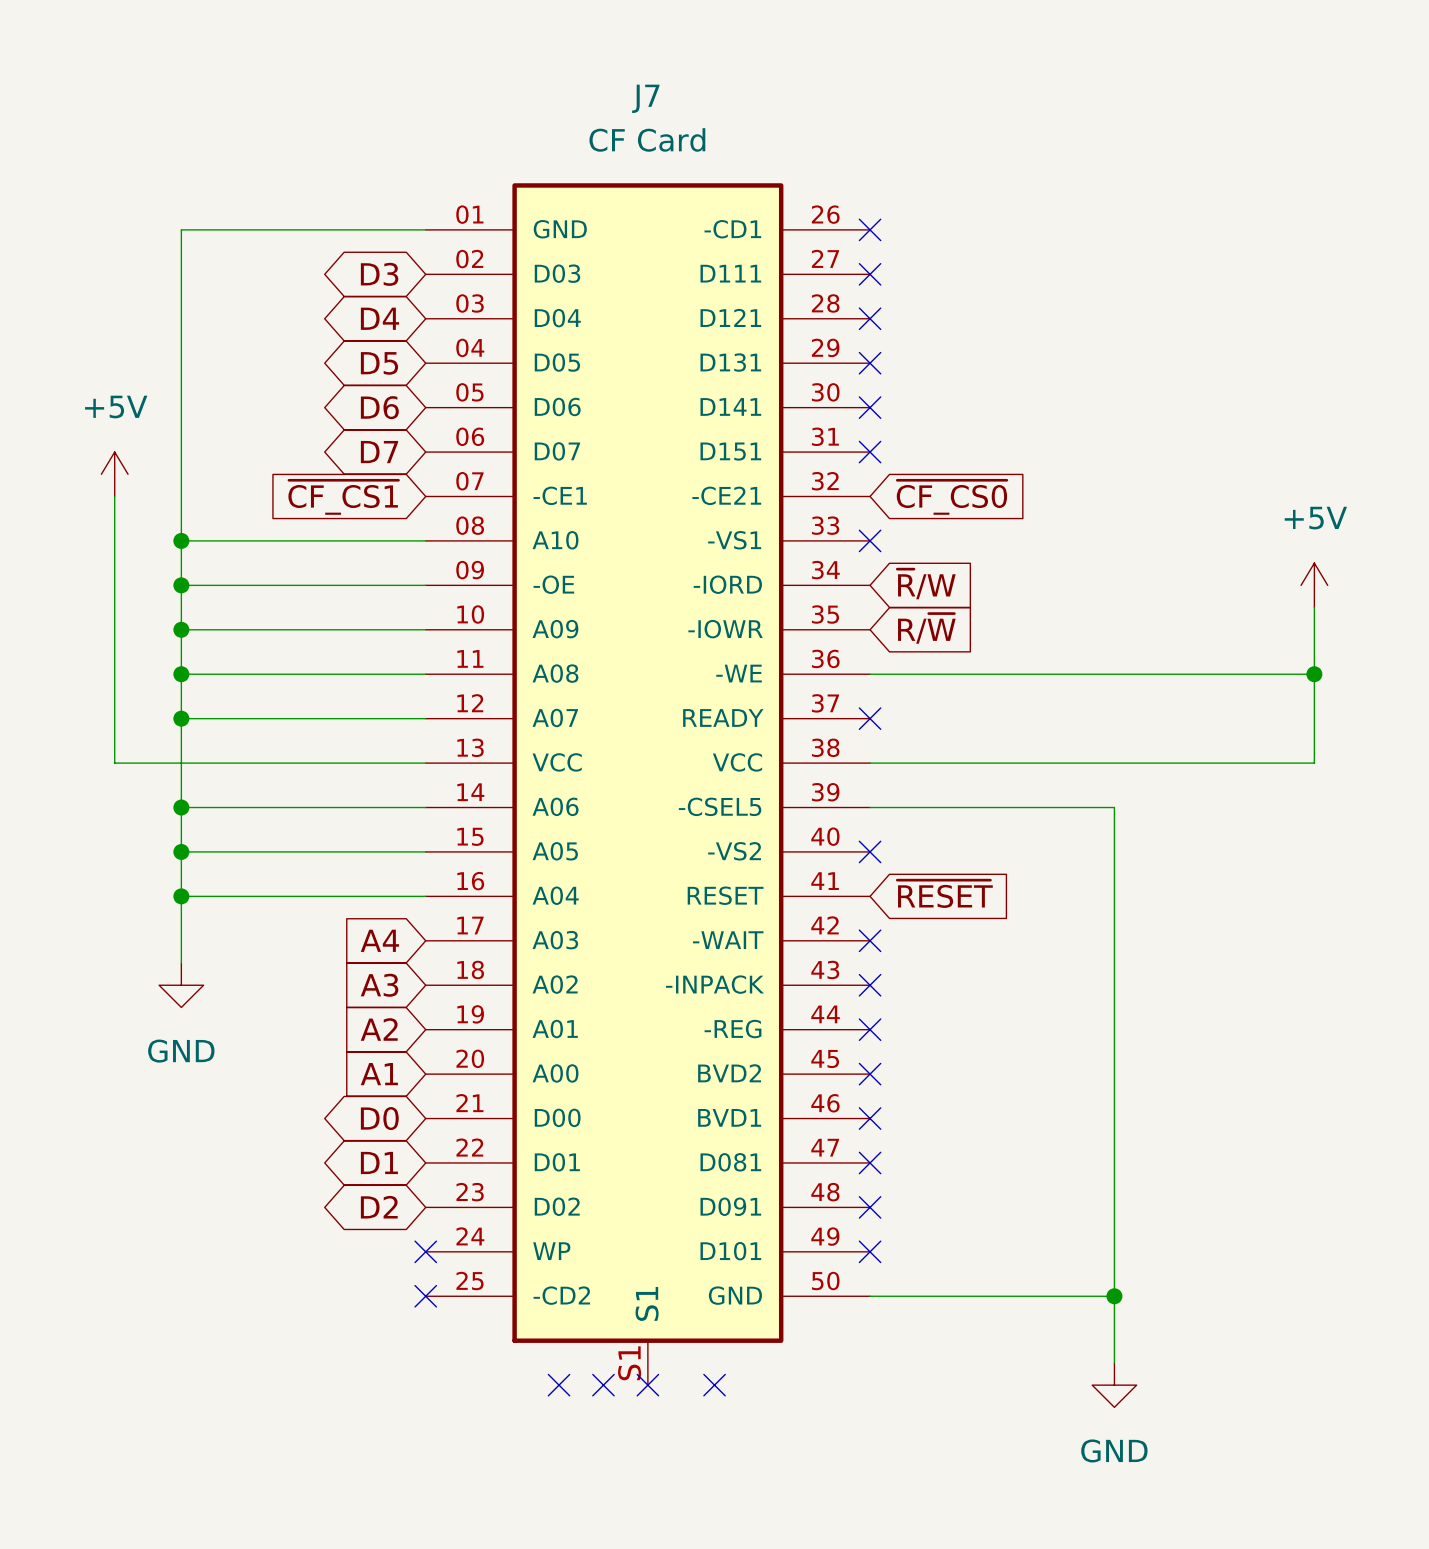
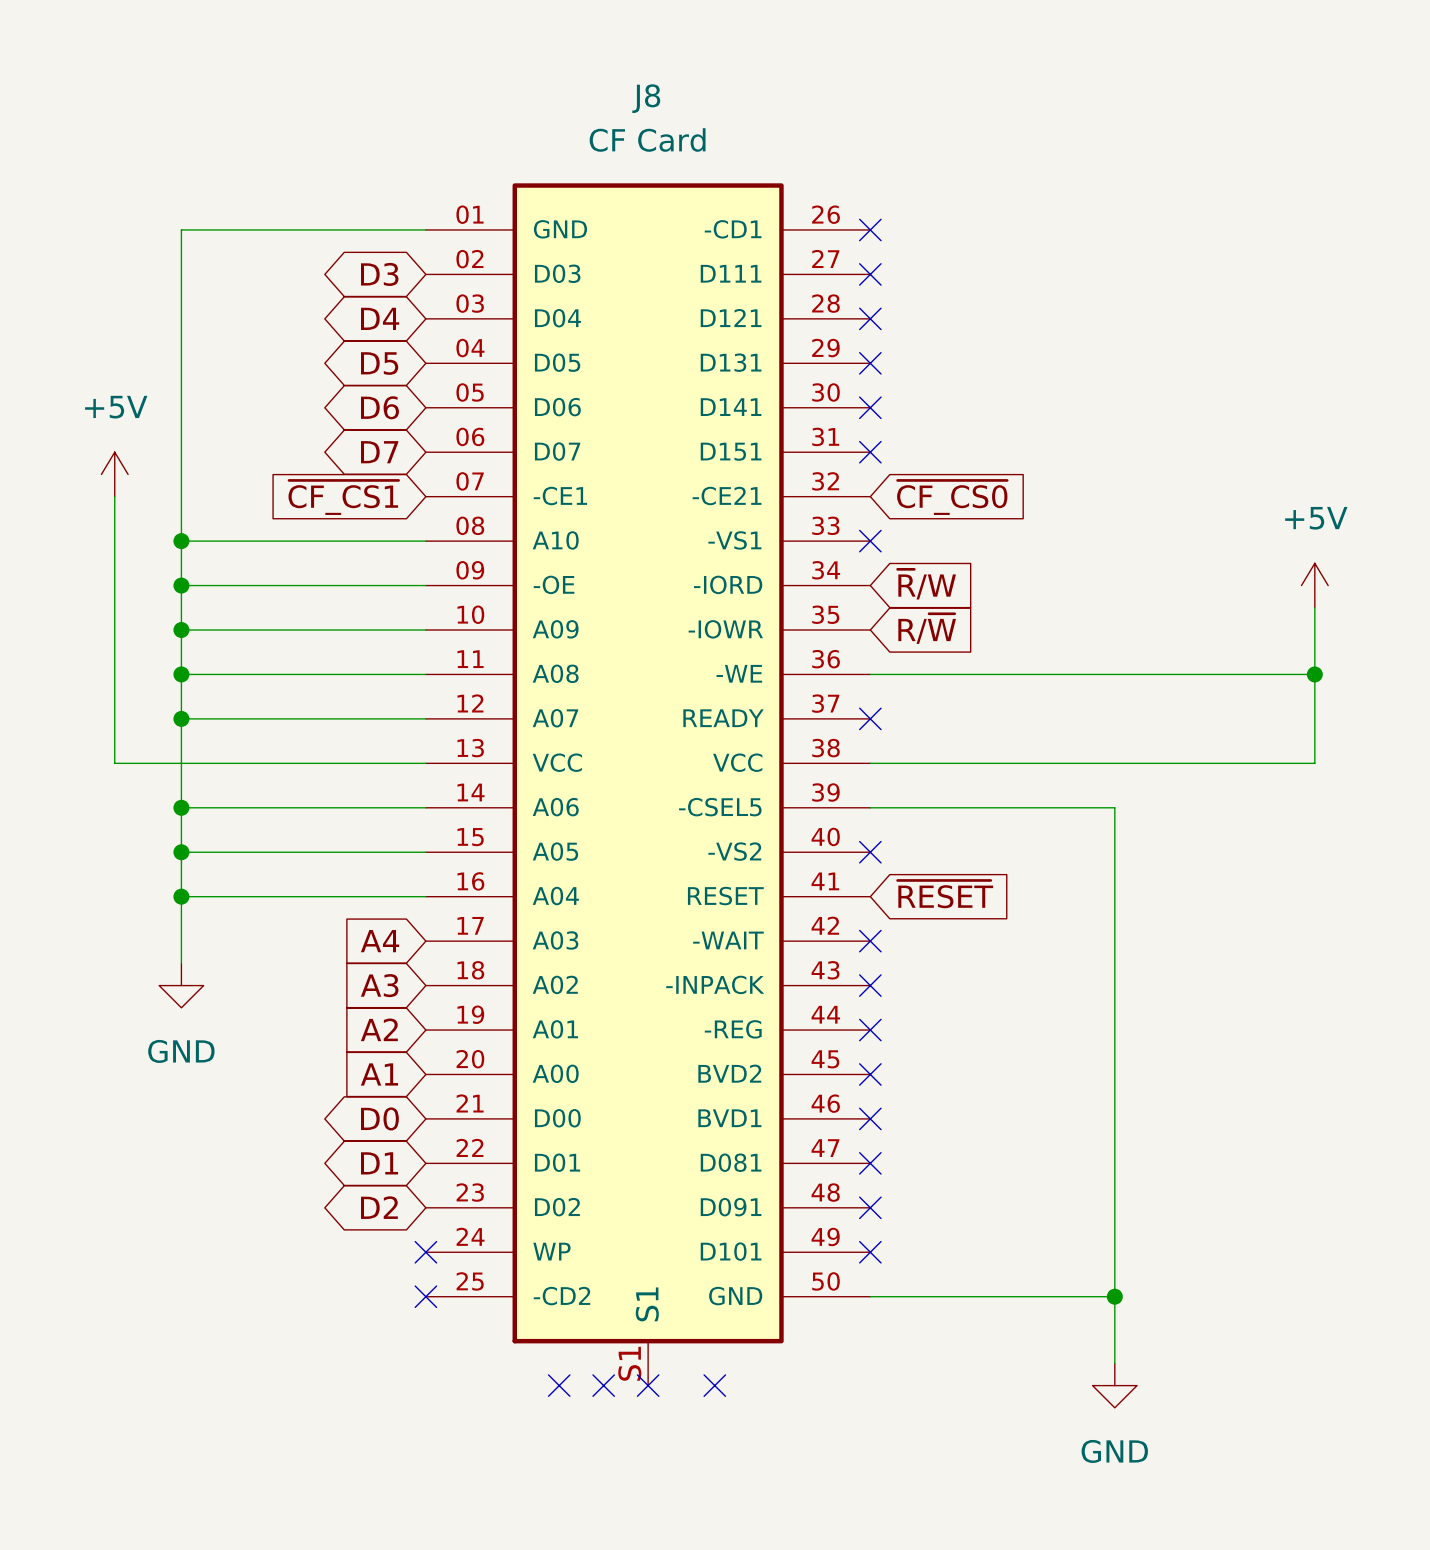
J7 name: J7 (645, 98) -> J8 (646, 98)

